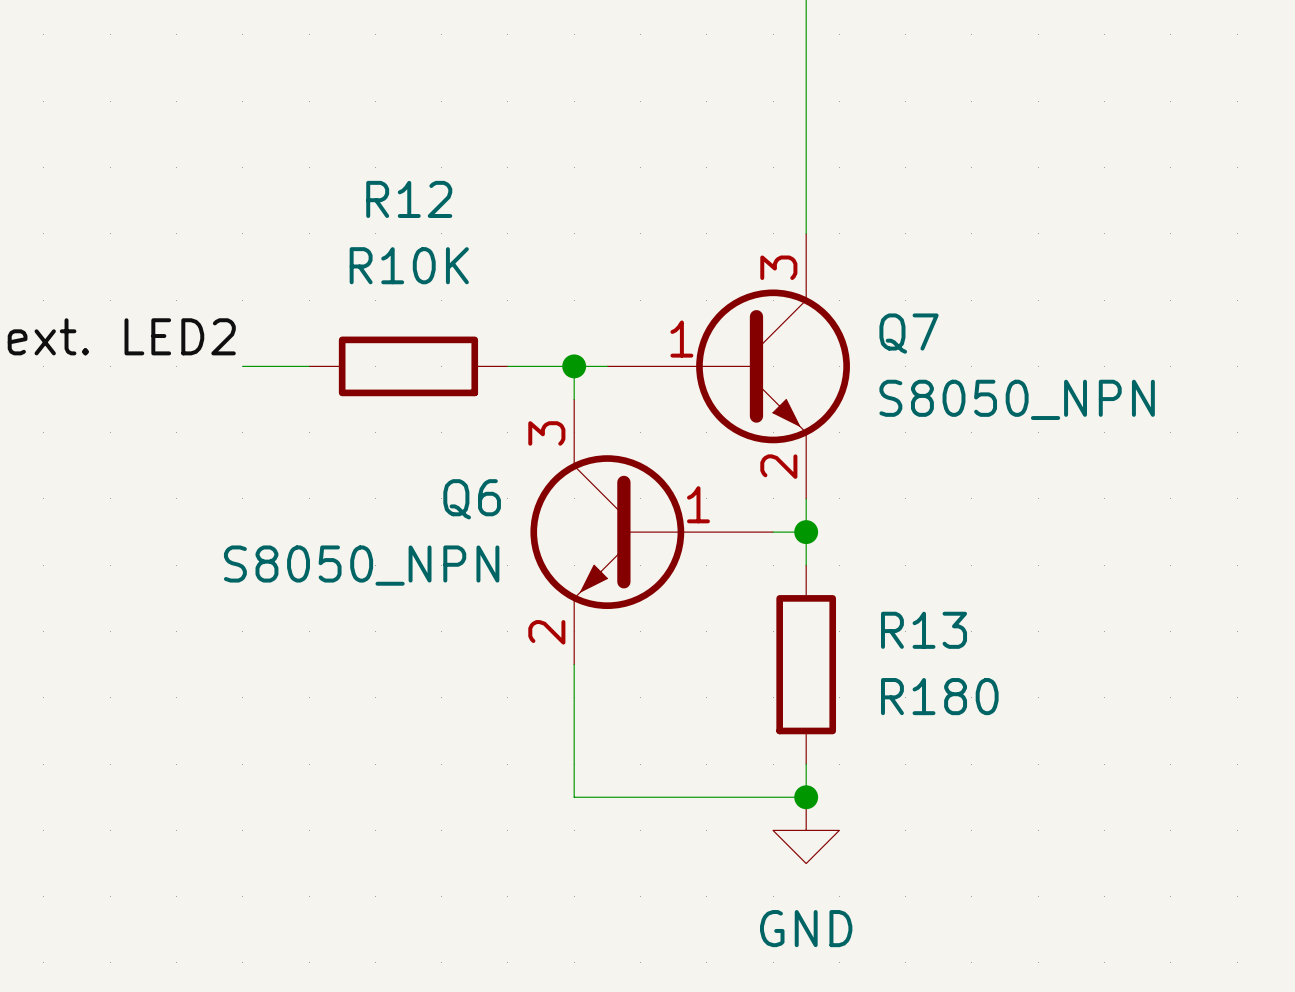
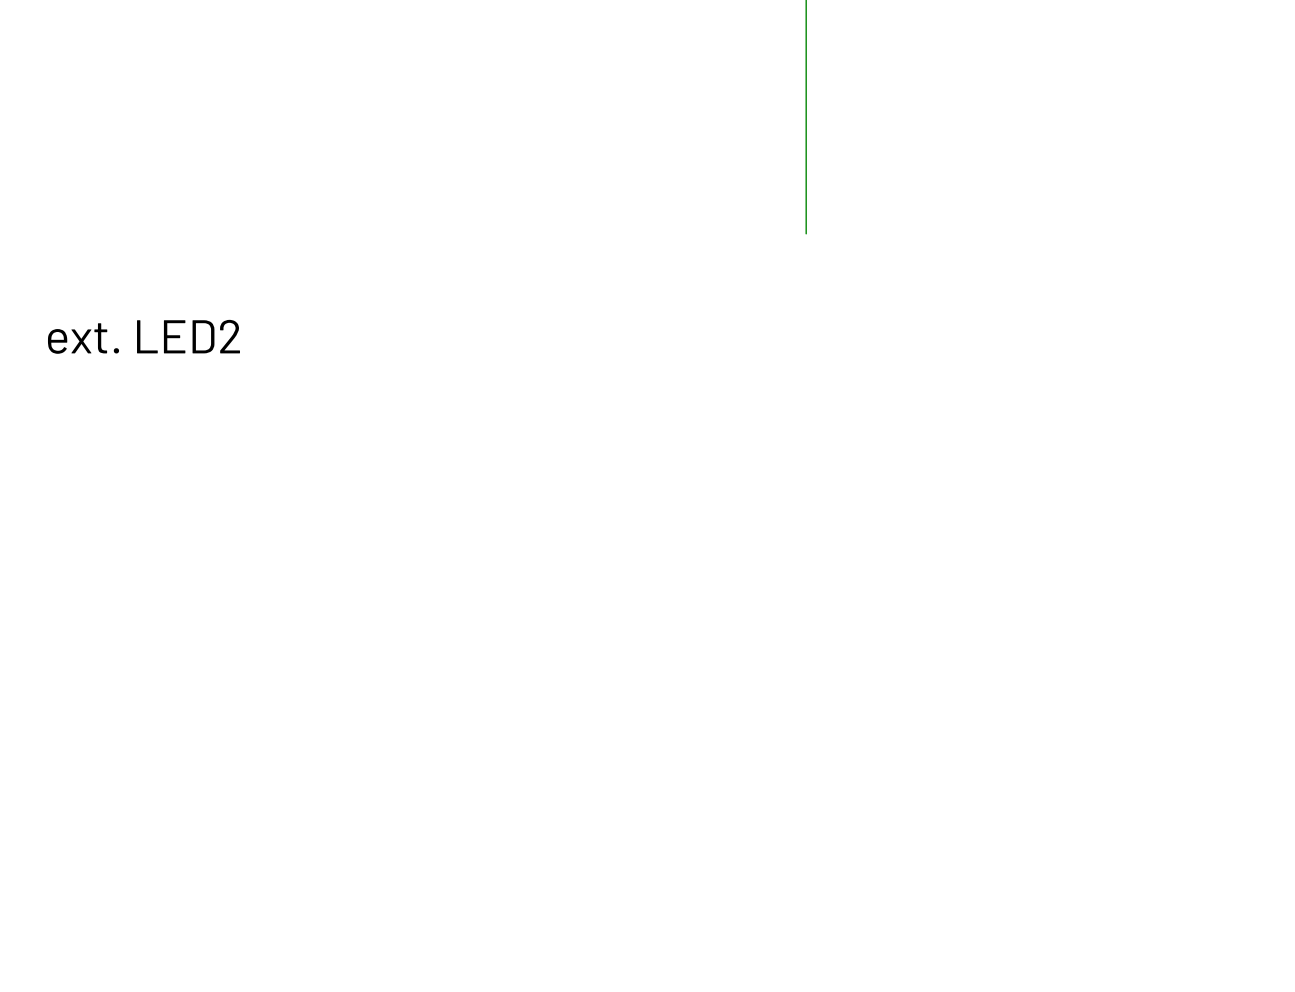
wire: (242, 366) (309, 366) -> none
R12: R10K (408, 366) -> none
wire: (507, 366) (607, 366) -> none
wire: (574, 366) (574, 399) -> none
junction: (574, 366) -> none
Q7: S8050_NPN (728, 366) -> none
wire: (806, 498) (806, 565) -> none
Q6: S8050_NPN (651, 532) -> none
wire: (773, 532) (806, 532) -> none
junction: (806, 532) -> none
wire: (574, 664) (574, 797) (806, 797) (806, 764) -> none
R13: R180 (806, 664) -> none
junction: (806, 797) -> none
power symbol: GND (806, 830) -> none

